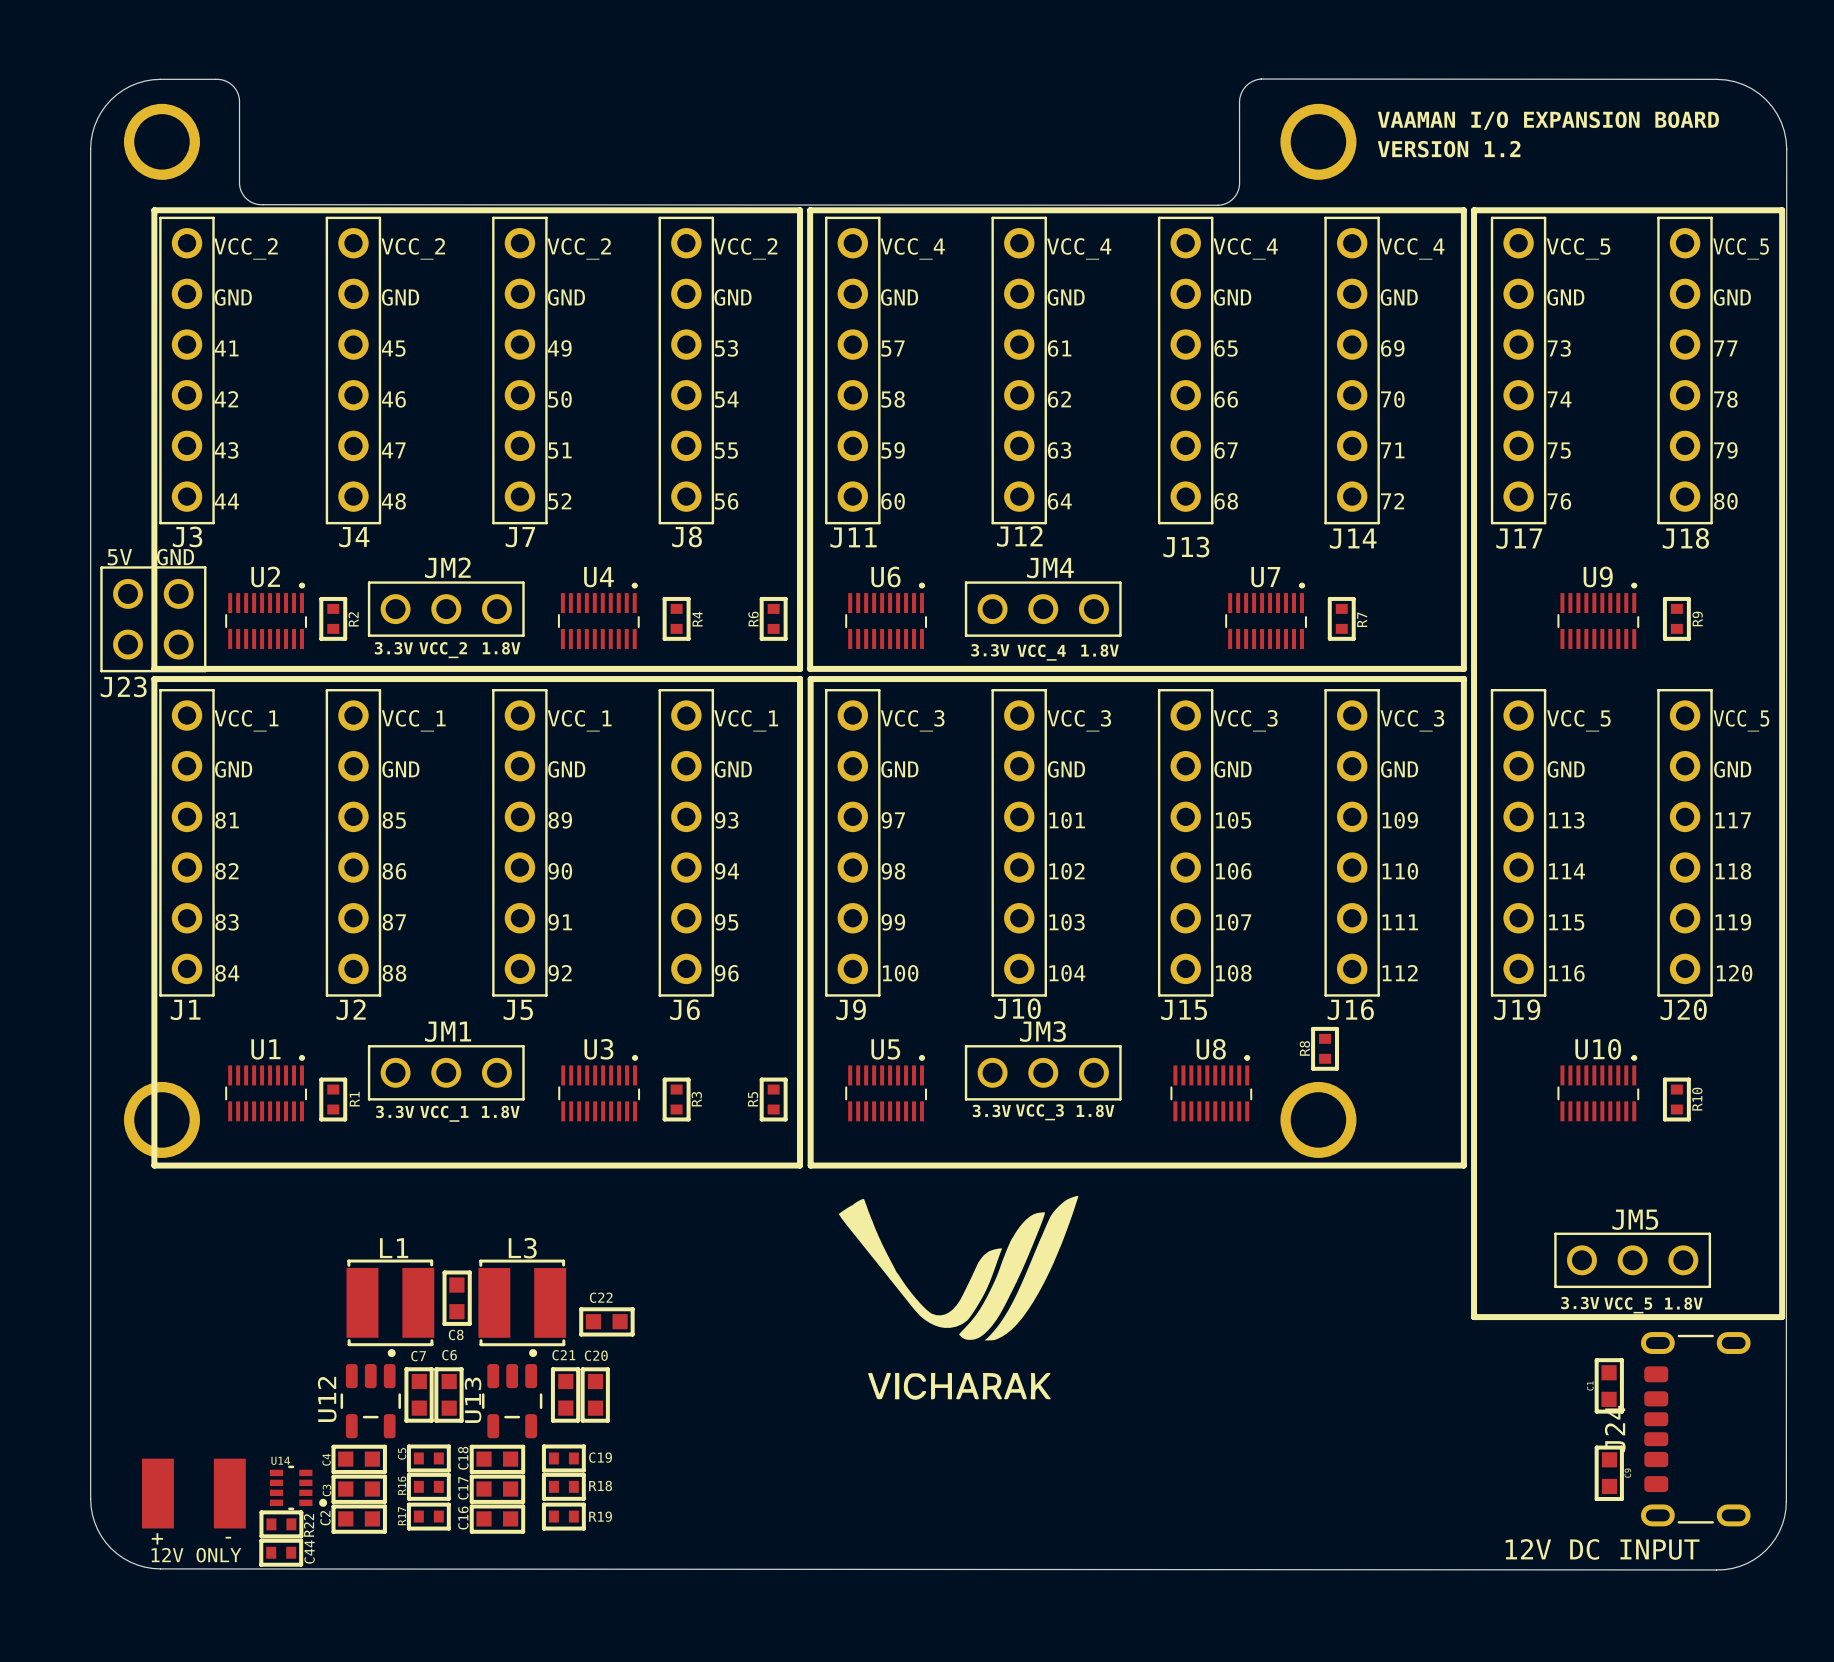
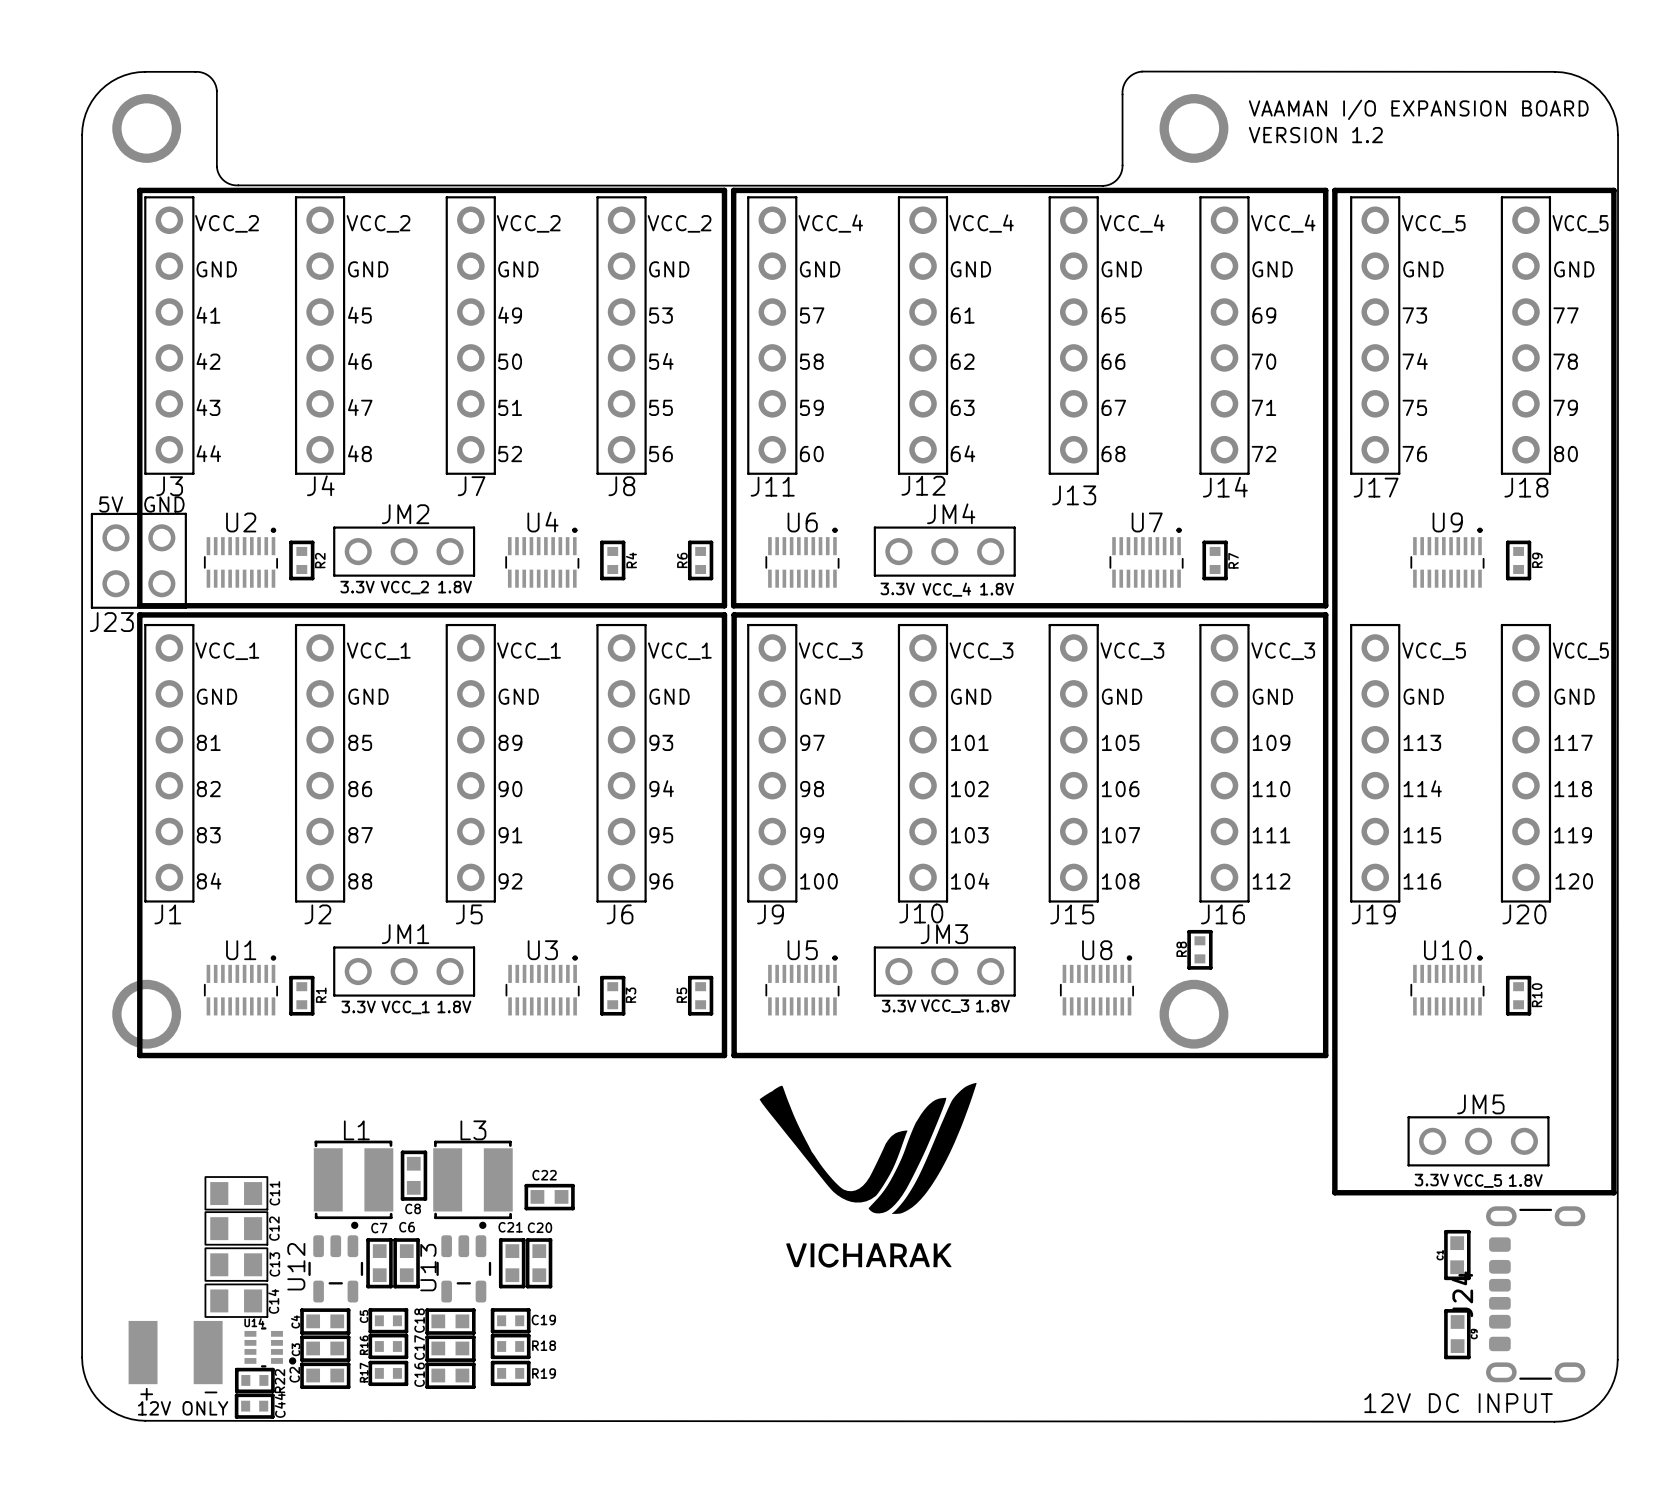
C11: none -> (236, 1193)
C12: none -> (236, 1228)
C13: none -> (236, 1264)
C14: none -> (236, 1300)

